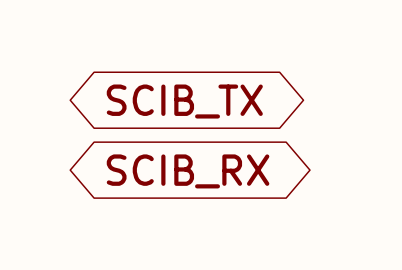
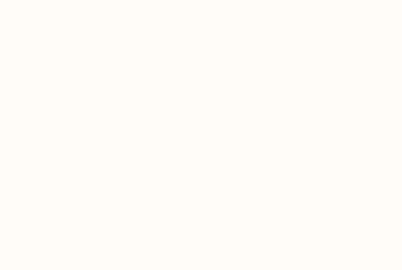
global label: SCIB_TX (184, 101) -> none
global label: SCIB_RX (188, 171) -> none

